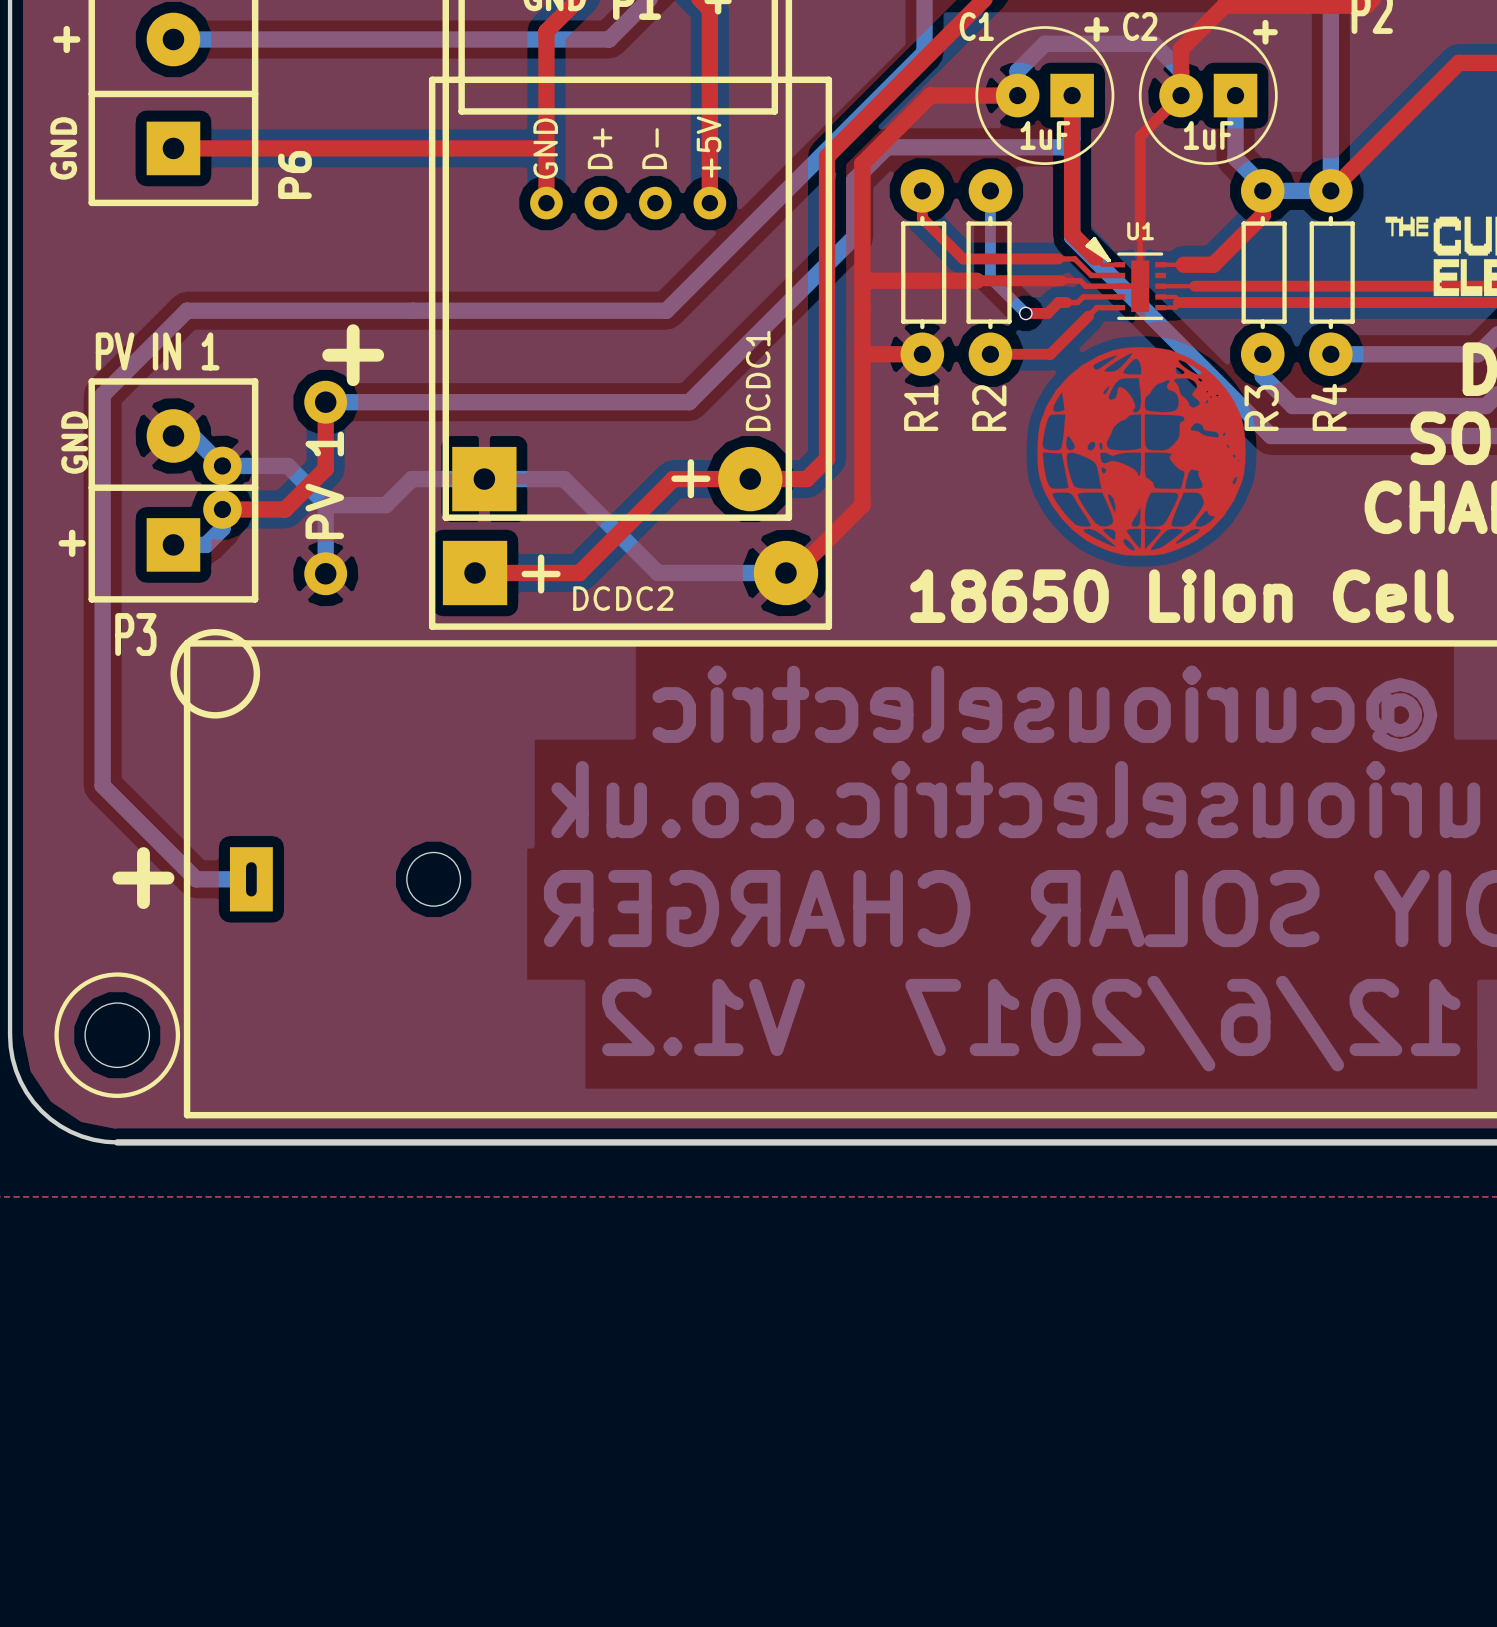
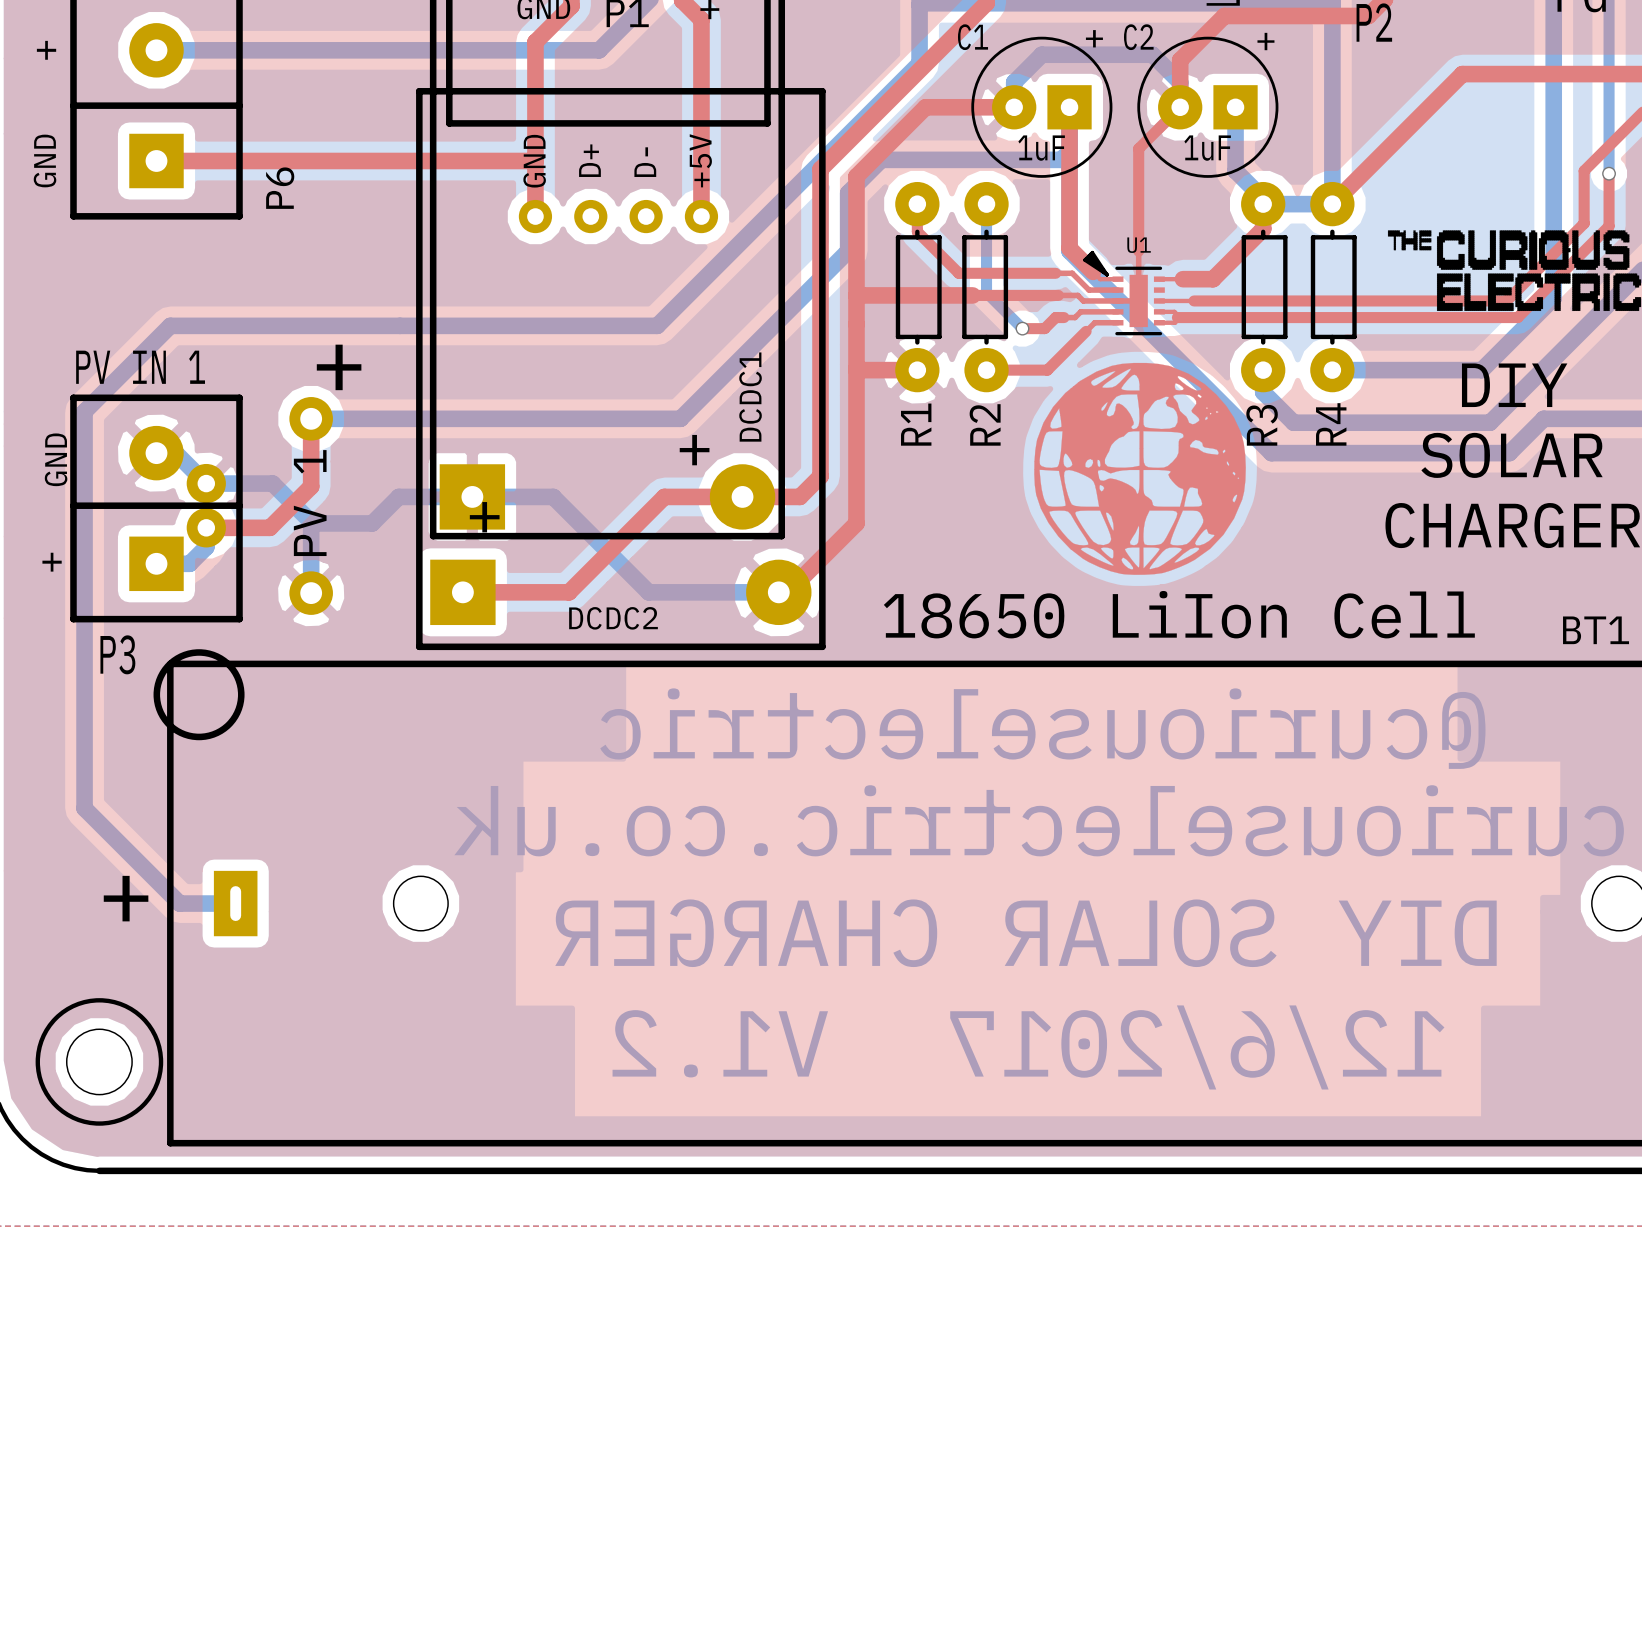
DCDC1 text position: + (690, 478) -> + (694, 450)
DCDC2 text position: + (541, 574) -> + (484, 517)

